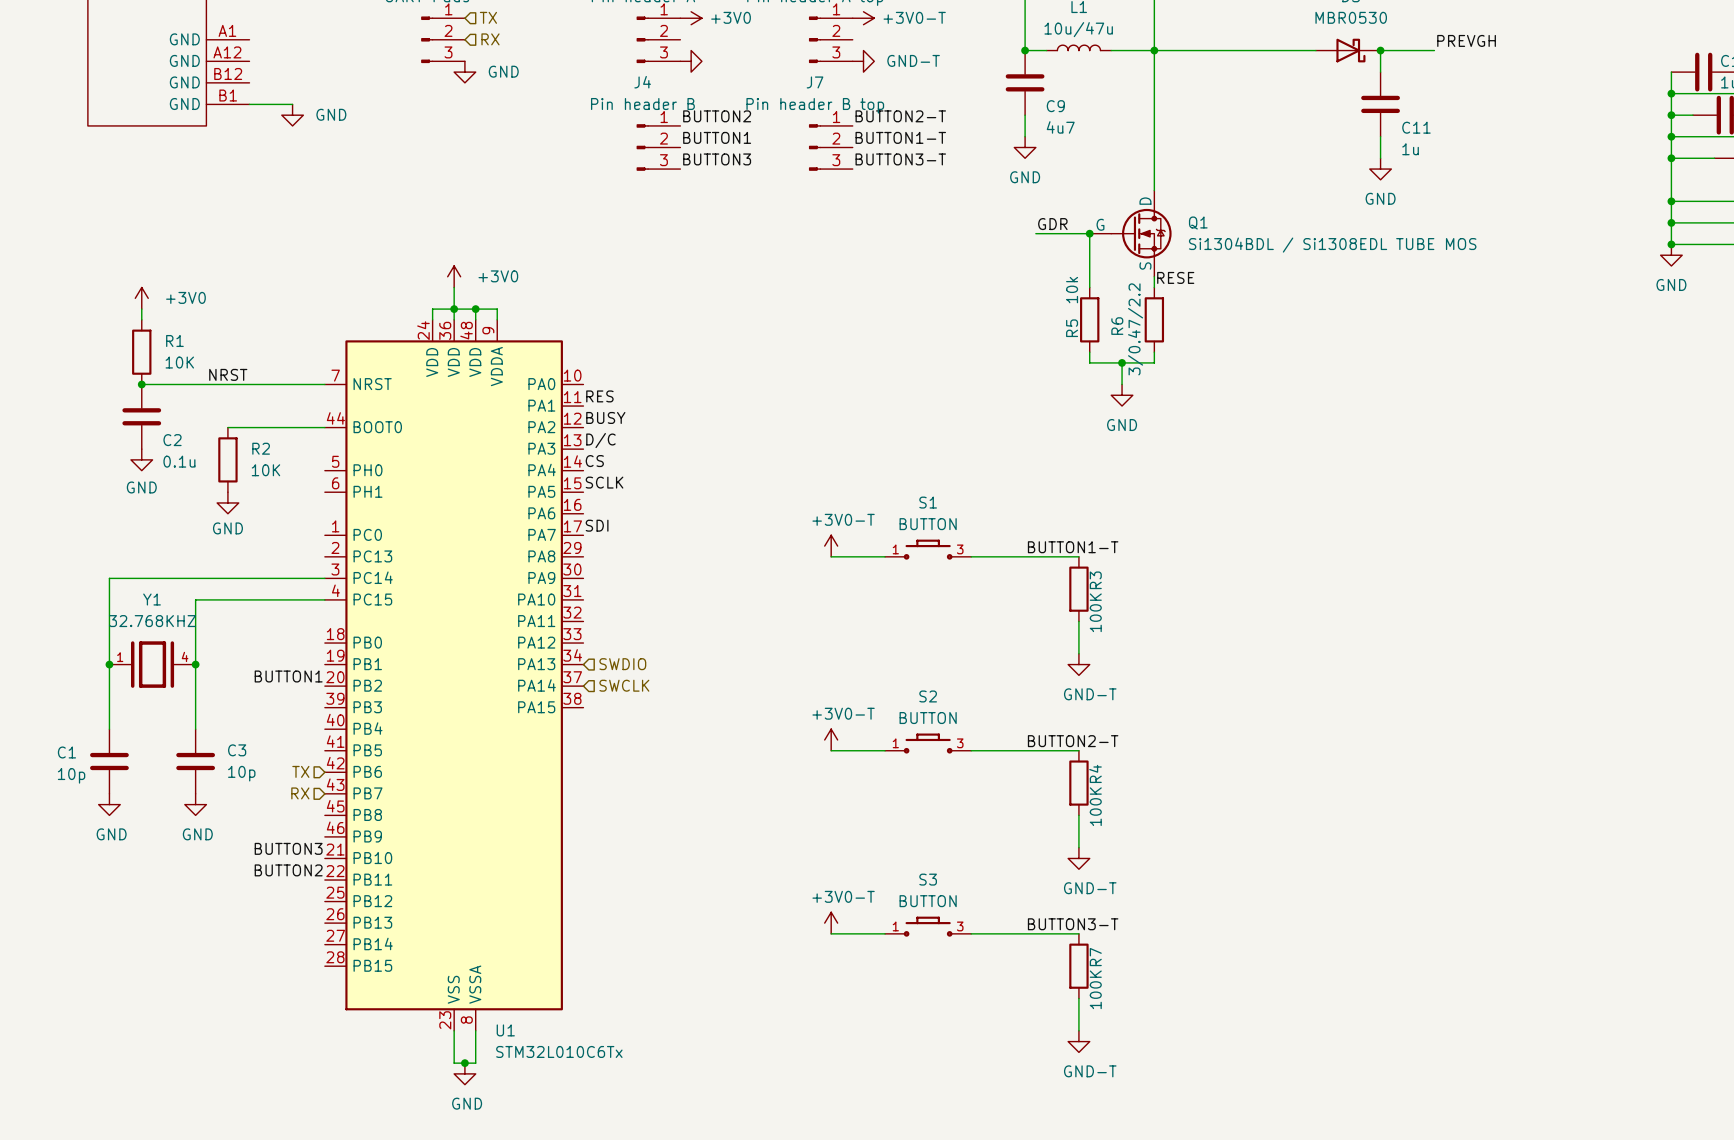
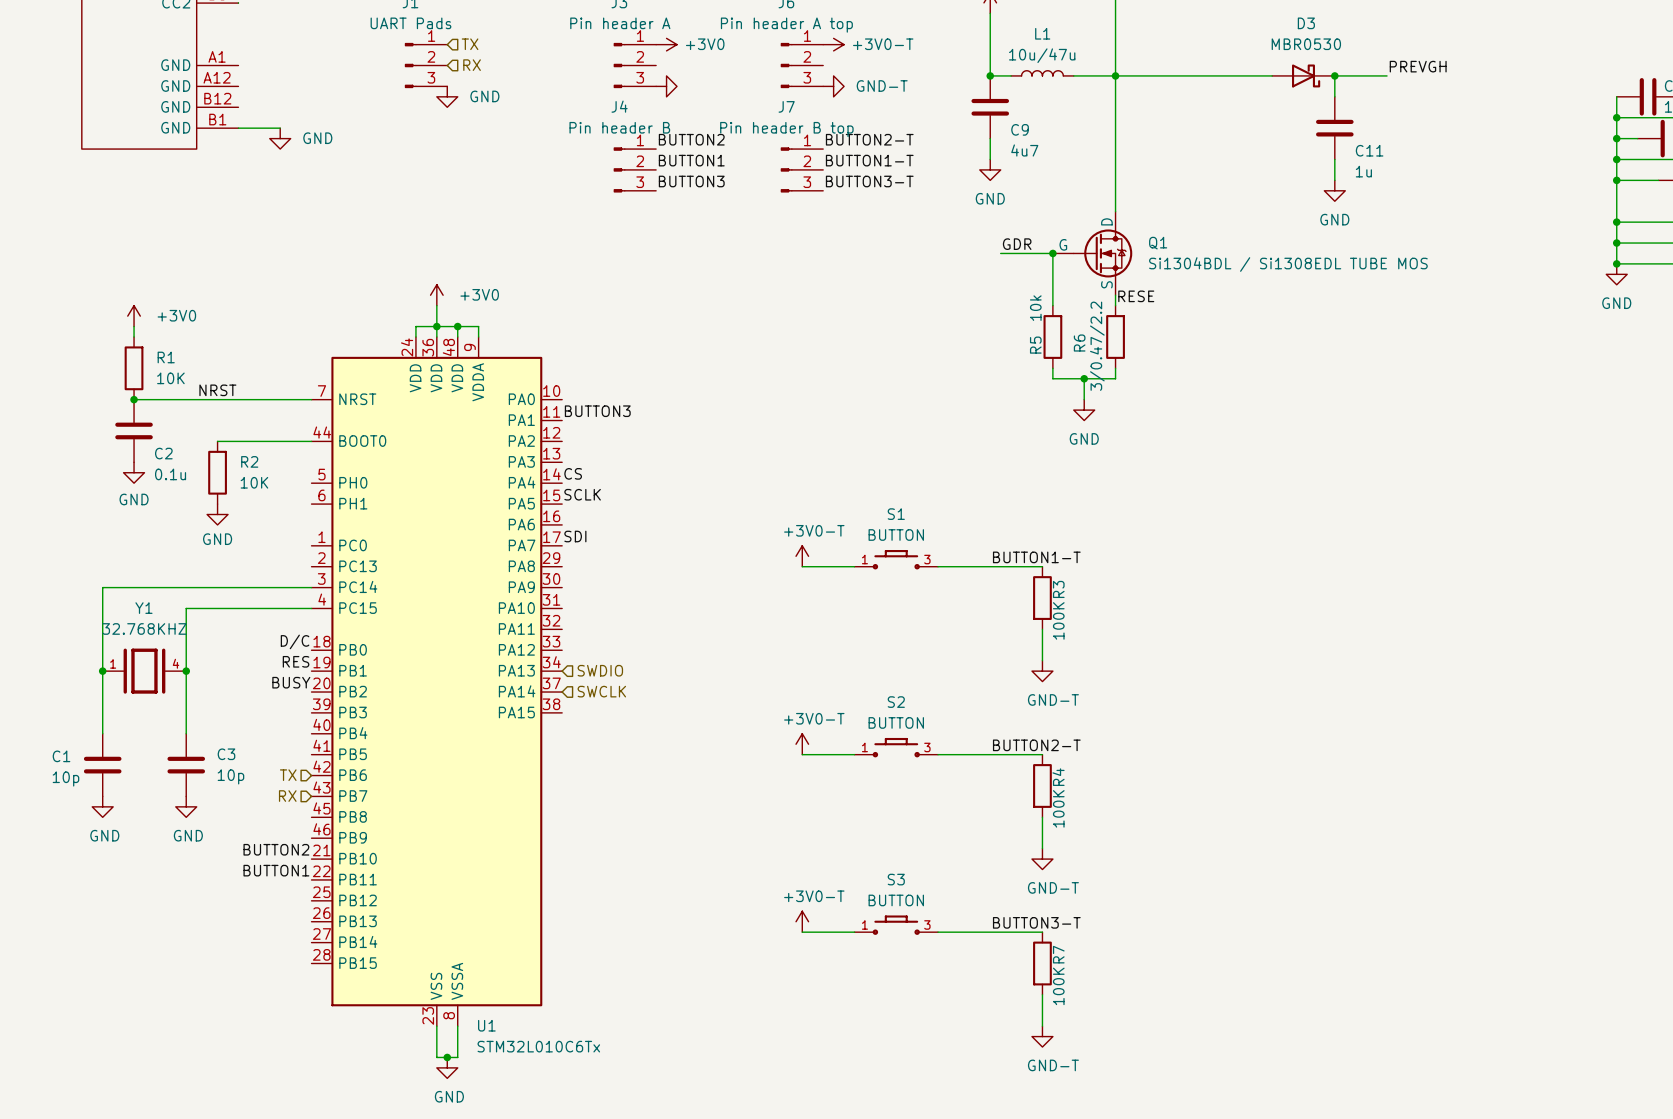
label: RES (599, 396) -> BUTTON3 (597, 411)
label: BUSY (605, 417) -> none
label: D/C (600, 440) -> none
label: none -> D/C (295, 641)
label: none -> RES (296, 661)
label: BUTTON1 (288, 676) -> BUSY (291, 682)
label: BUTTON3 (288, 848) -> BUTTON2 (276, 849)
label: BUTTON2 (288, 870) -> BUTTON1 (276, 870)

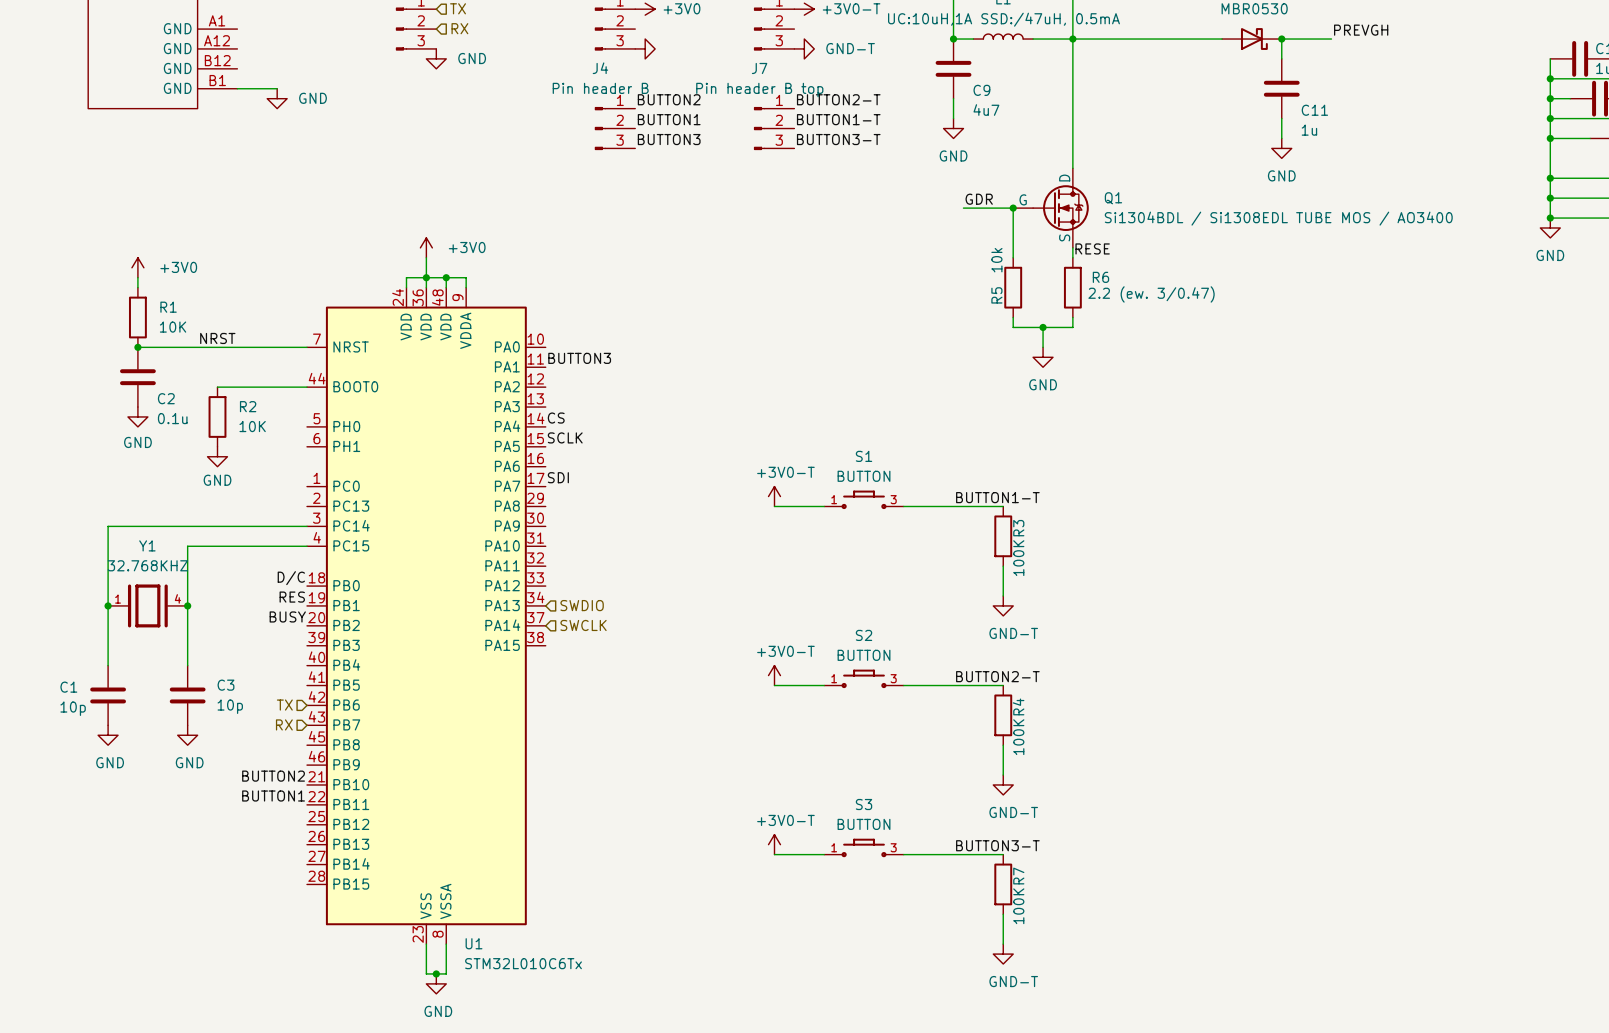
L1 value: 10u/47u (1042, 55) -> UC:10uH,1A SSD:/47uH, 0.5mA (1003, 19)
Q1 value: Si1304BDL / Si1308EDL TUBE MOS (1288, 264) -> Si1304BDL / Si1308EDL TUBE MOS / AO3400 (1278, 218)
R6 name rotation: 0° (1079, 343) -> 90° clockwise (1100, 277)
R6 name position: R6 (1079, 343) -> R6 (1100, 277)
R6 value: 3/0.47/2.2 (1097, 346) -> 2.2 (ew. 3/0.47) (1151, 294)

